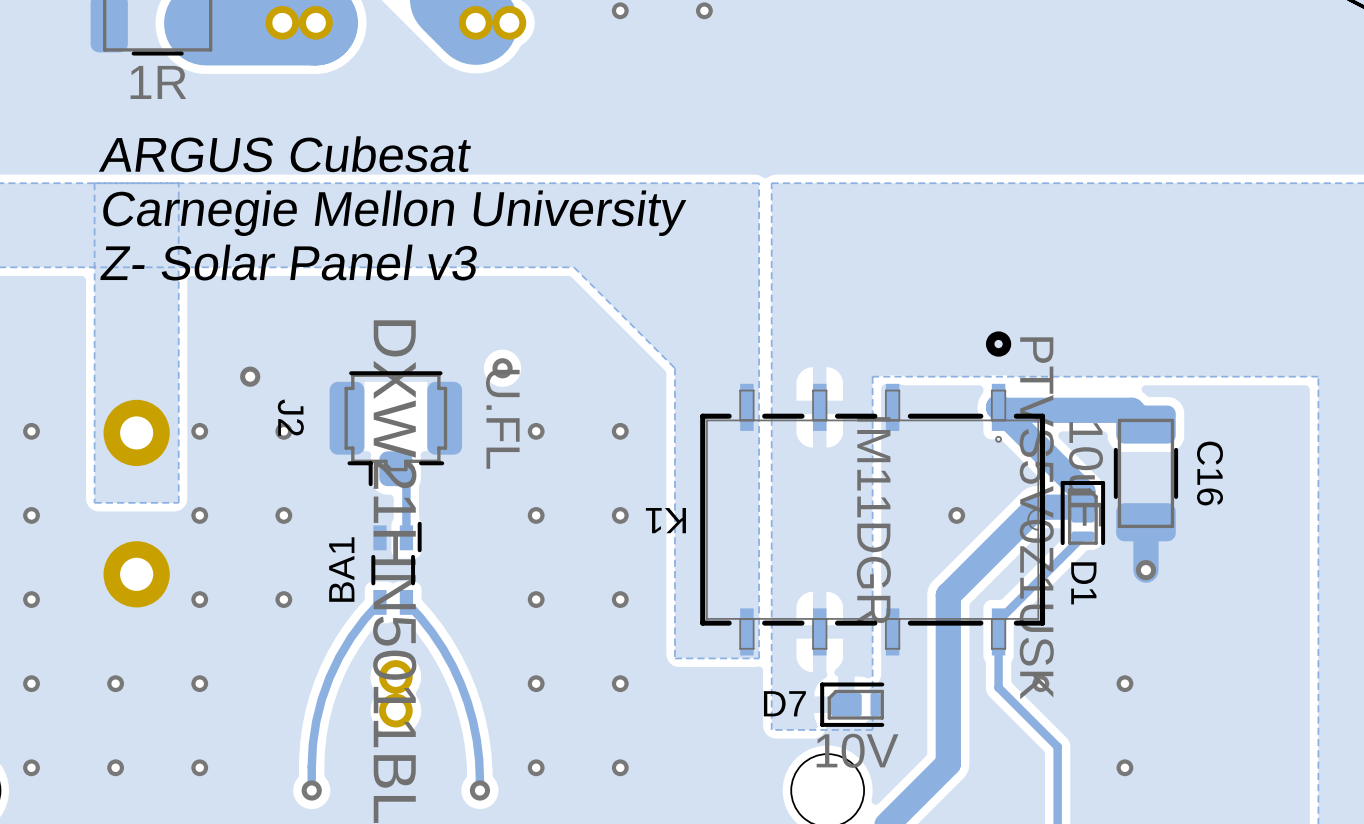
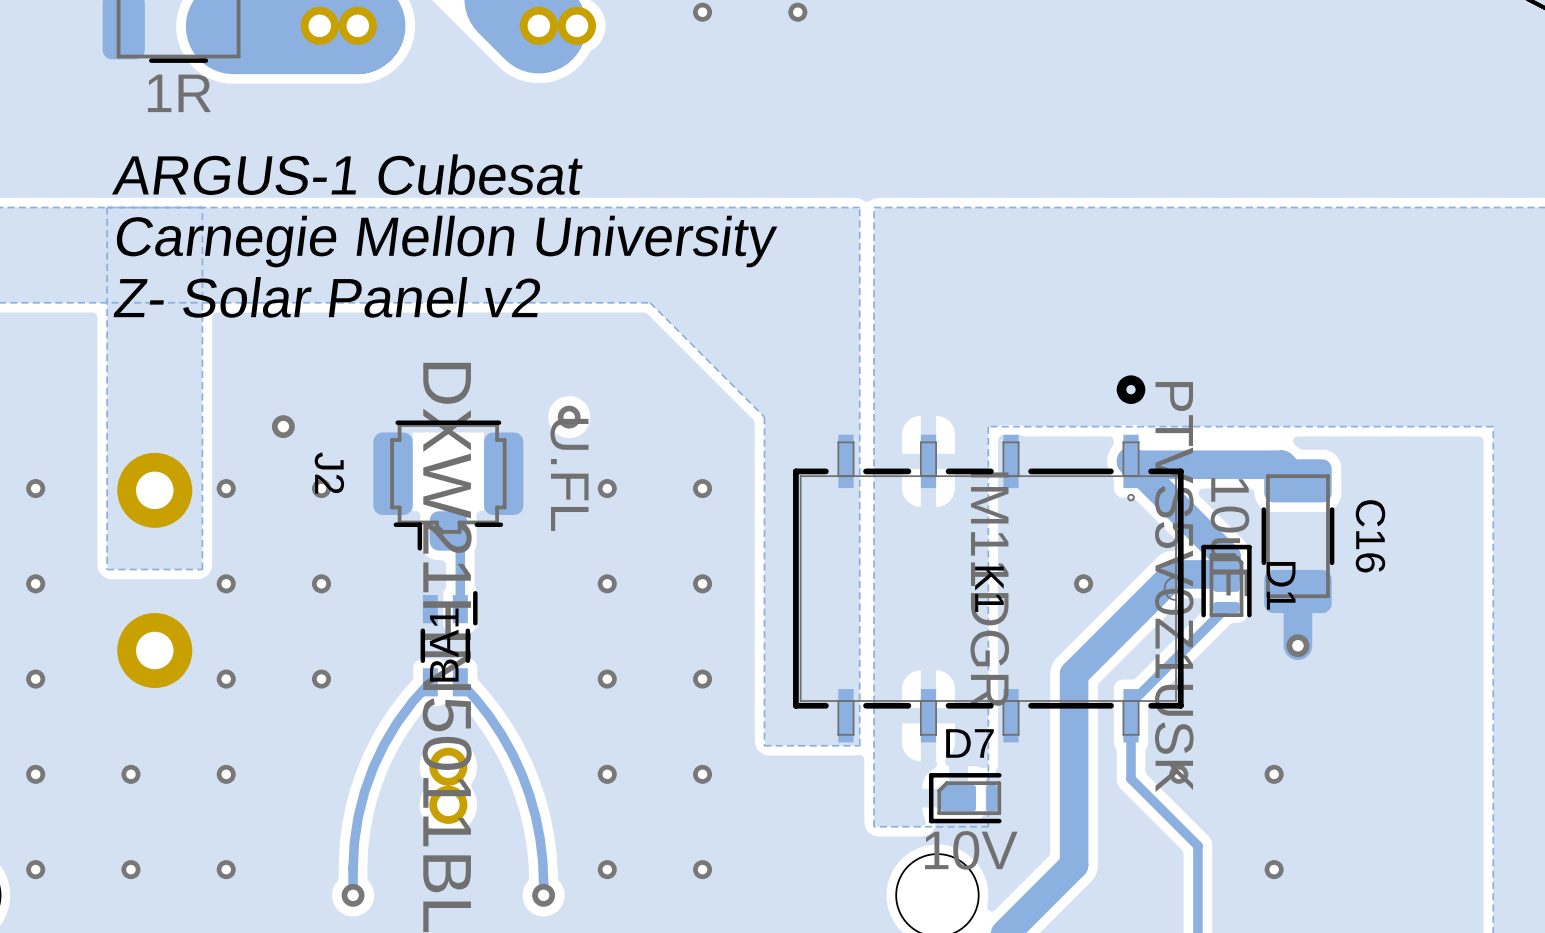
text: ARGUS Cubesat (284, 154) -> ARGUS-1 Cubesat (347, 174)
text: Z- Solar Panel v3 (288, 262) -> Z- Solar Panel v2 (327, 297)
K1 name rotation: 0° (665, 520) -> 90° counterclockwise (989, 589)
K1 name position: K1 (665, 520) -> K1 (989, 589)
BA1 name position: BA1 (341, 569) -> BA1 (444, 645)
D1 name position: D1 (1083, 583) -> D1 (1281, 585)
D7 name position: D7 (784, 703) -> D7 (969, 743)

